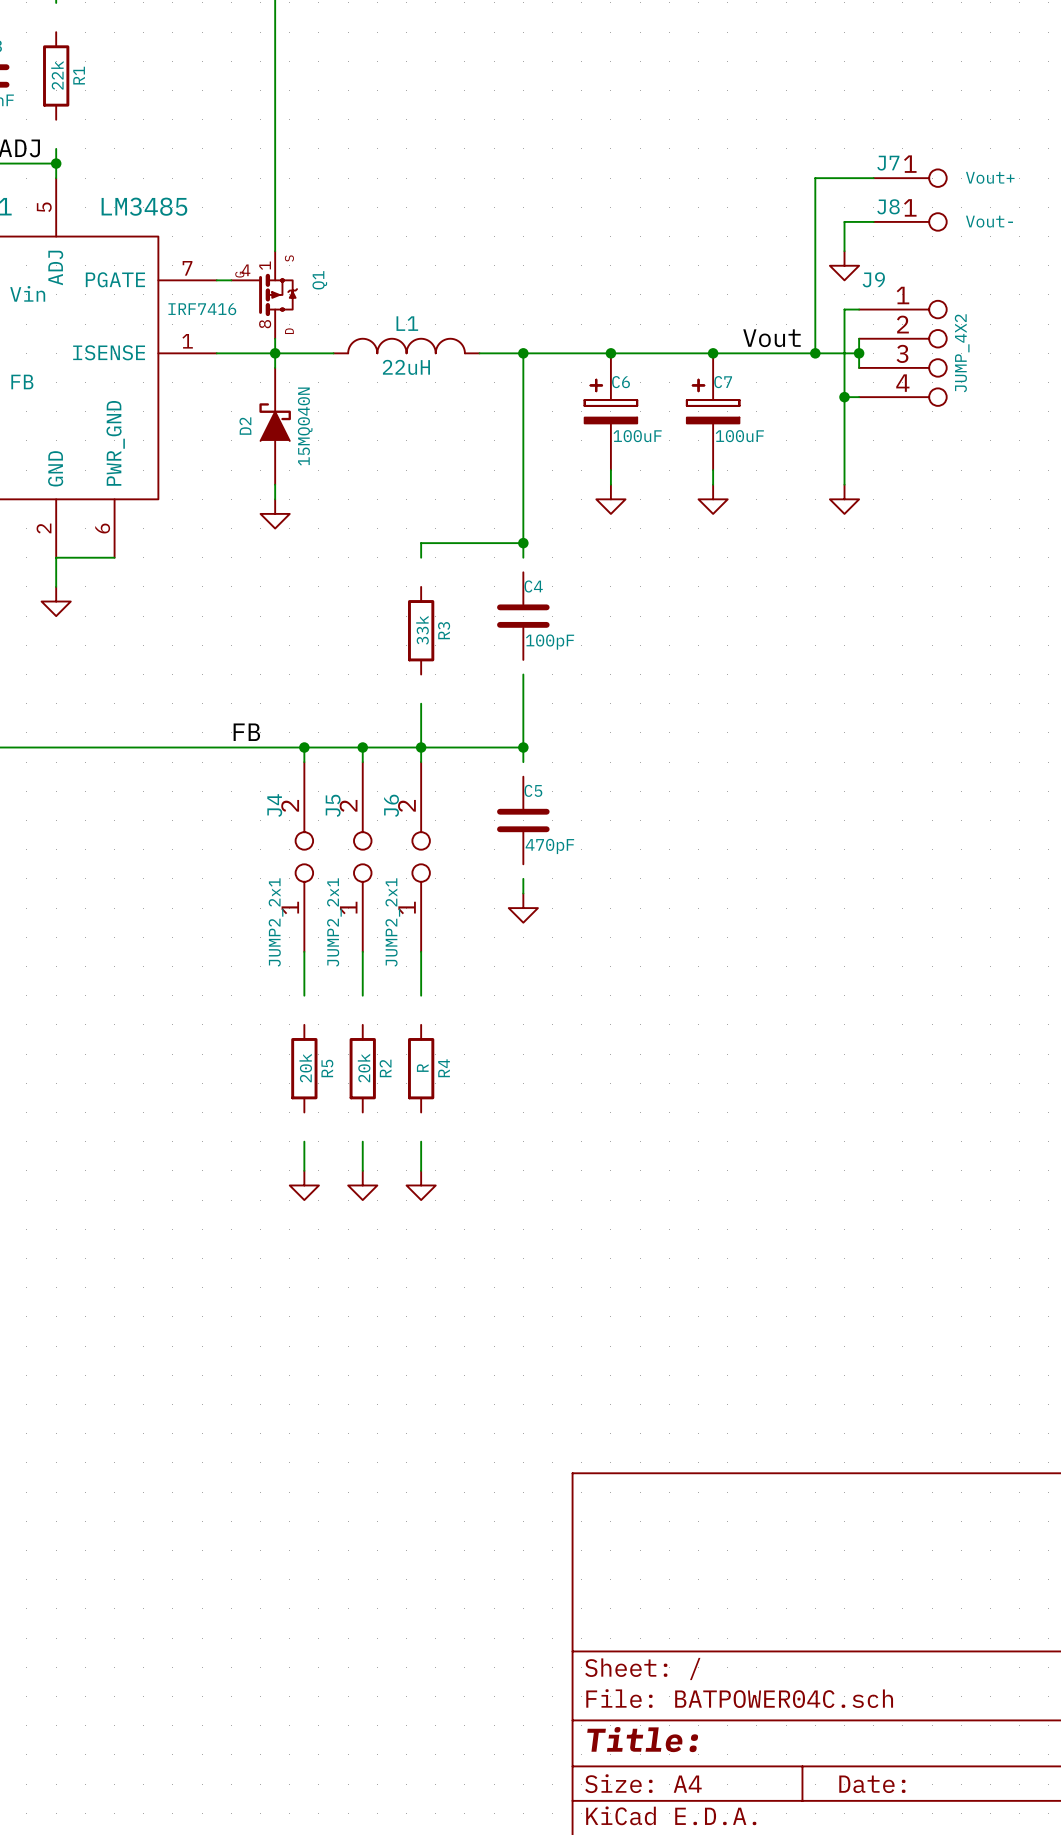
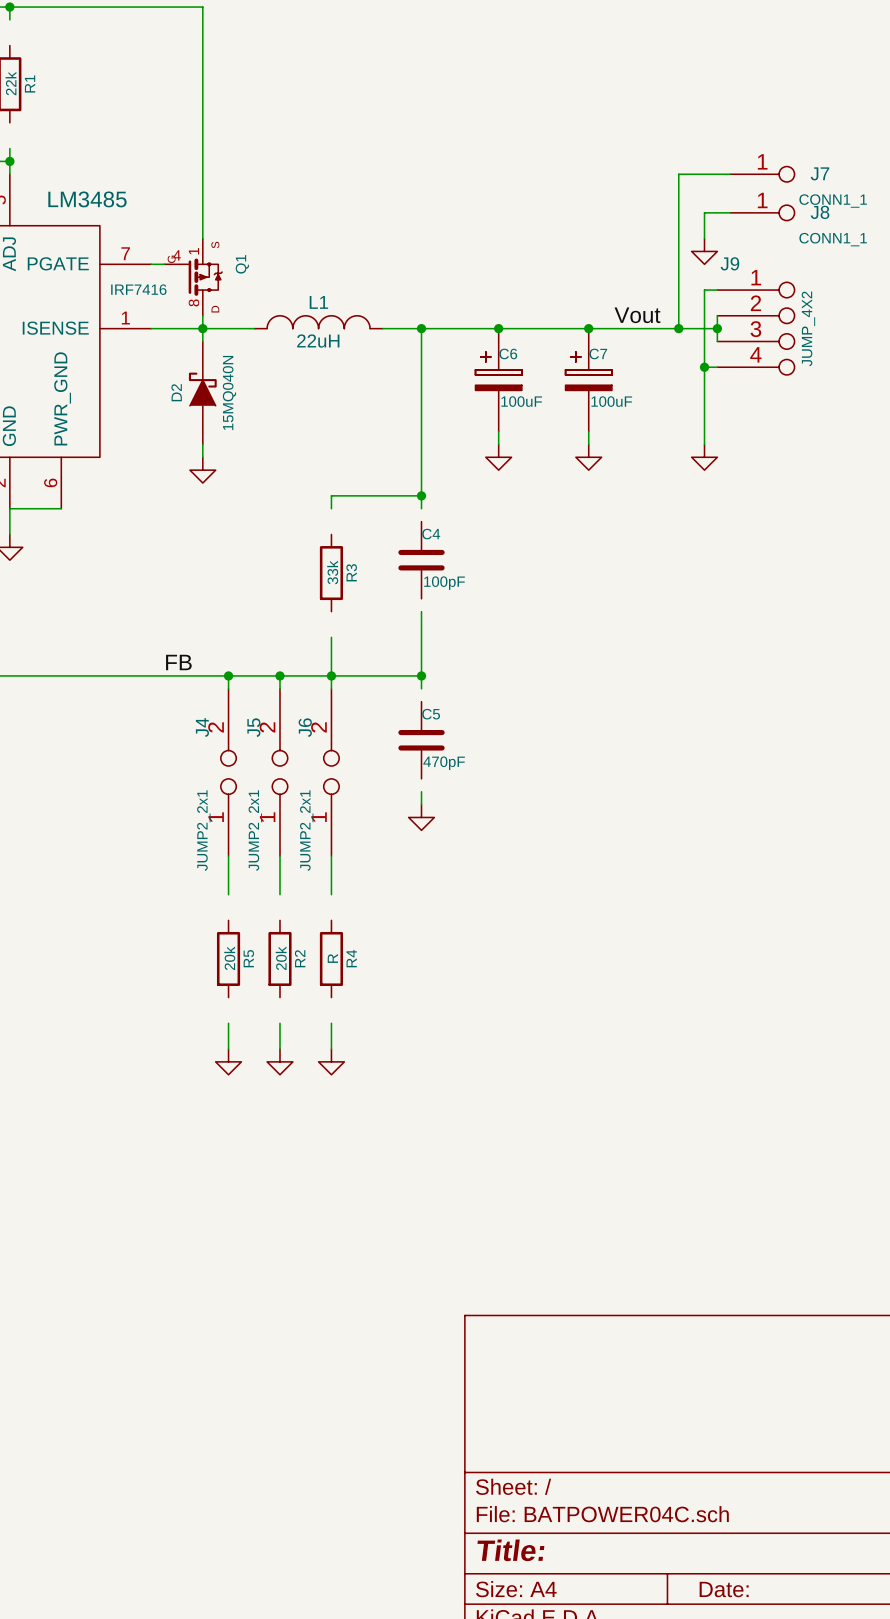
J7 name position: J7 (888, 163) -> J7 (819, 173)
J7 value: Vout+ (990, 177) -> CONN1_1 (833, 201)
J8 name position: J8 (888, 206) -> J8 (820, 212)
J8 value: Vout- (989, 221) -> CONN1_1 (833, 239)

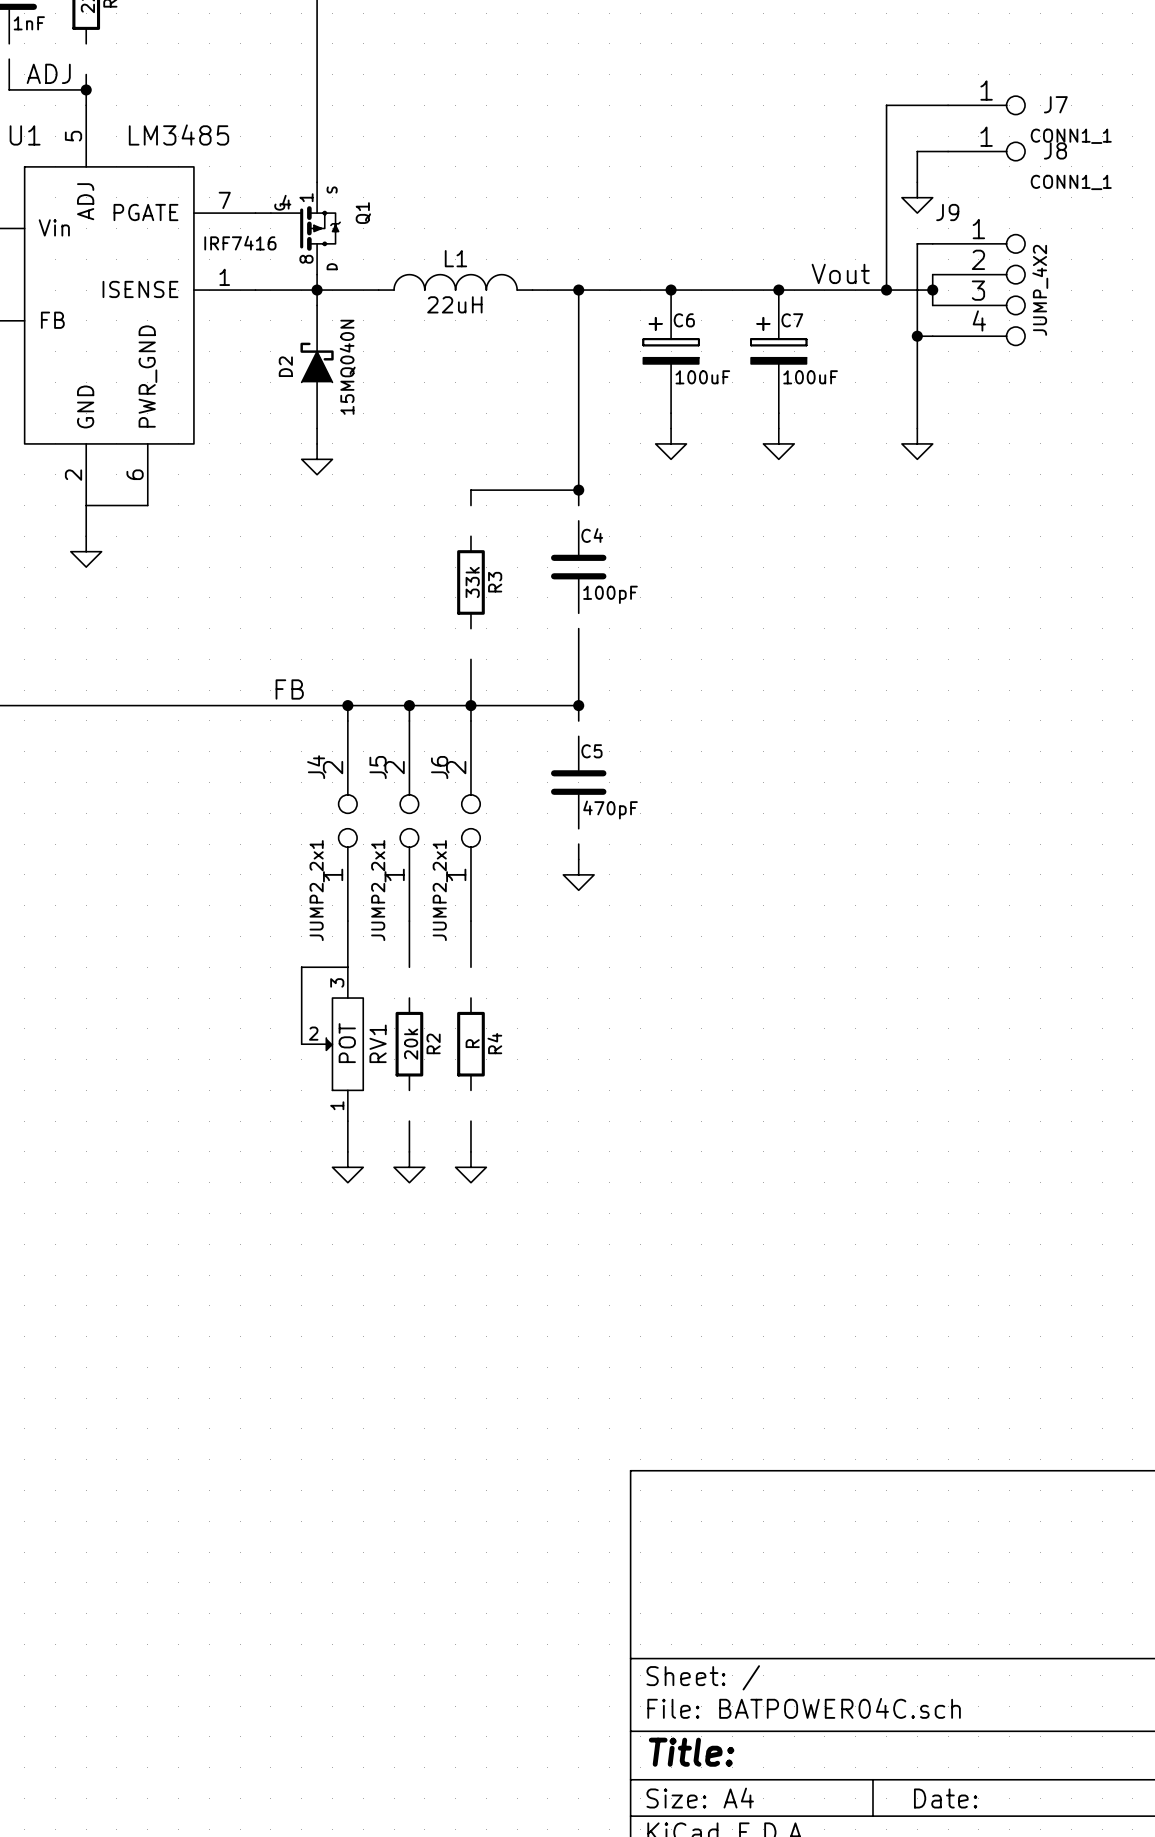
wire: none -> (347, 967) (301, 967) (301, 1044)
RV1: none -> POT (332, 1044)
R5: 20k (228, 958) -> none

